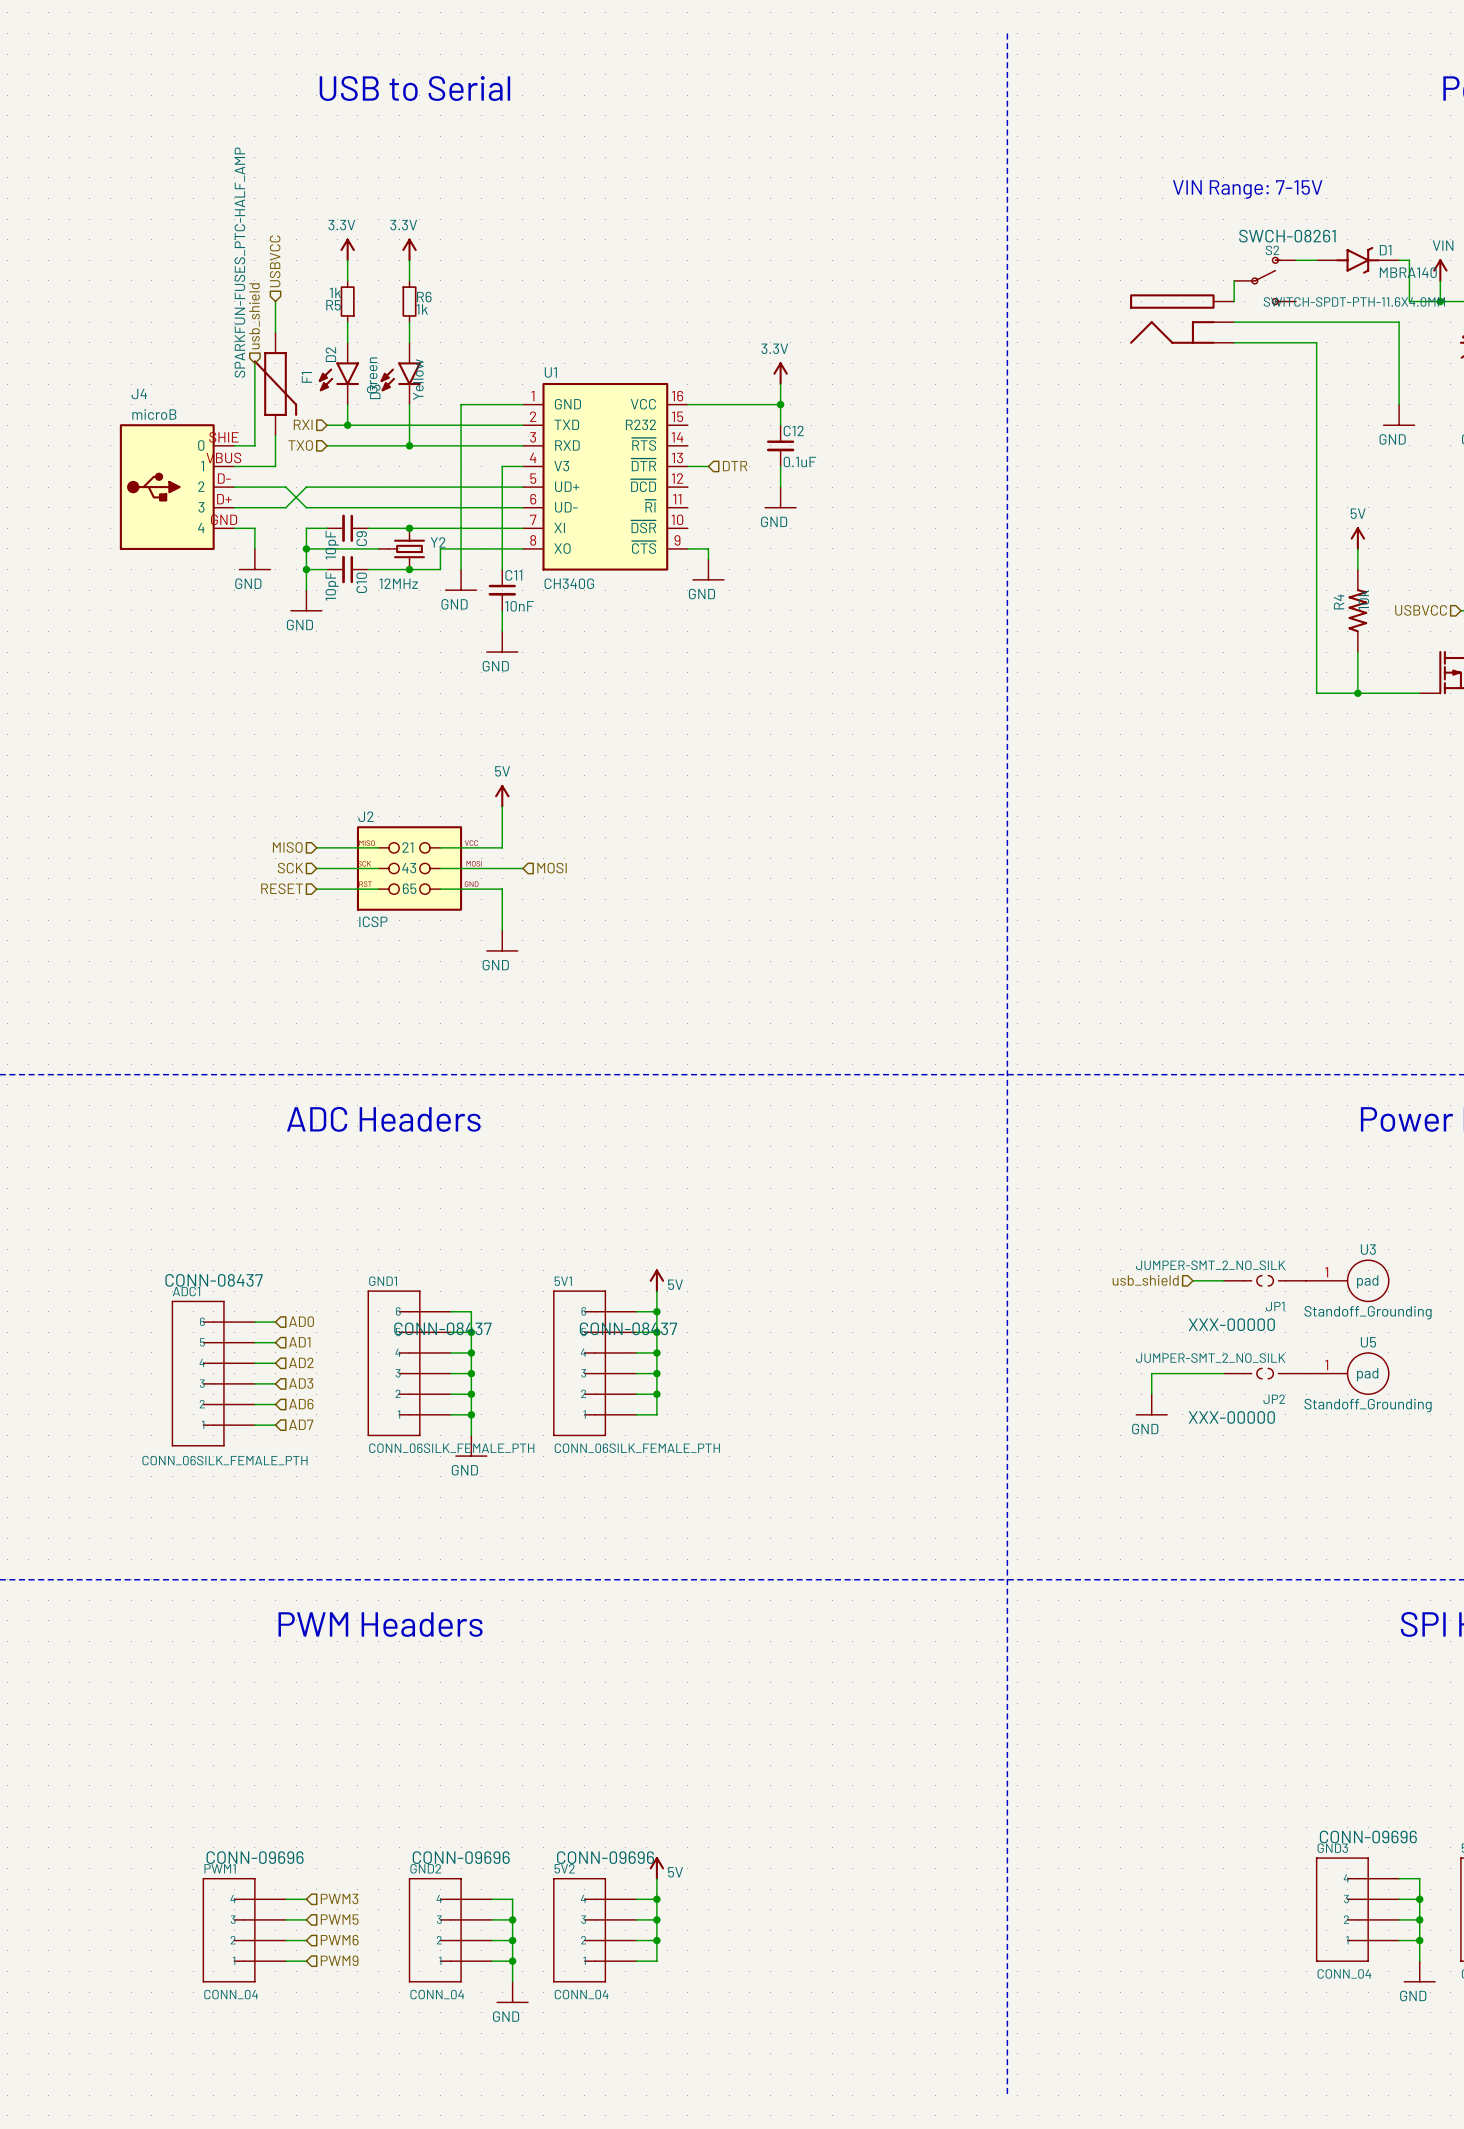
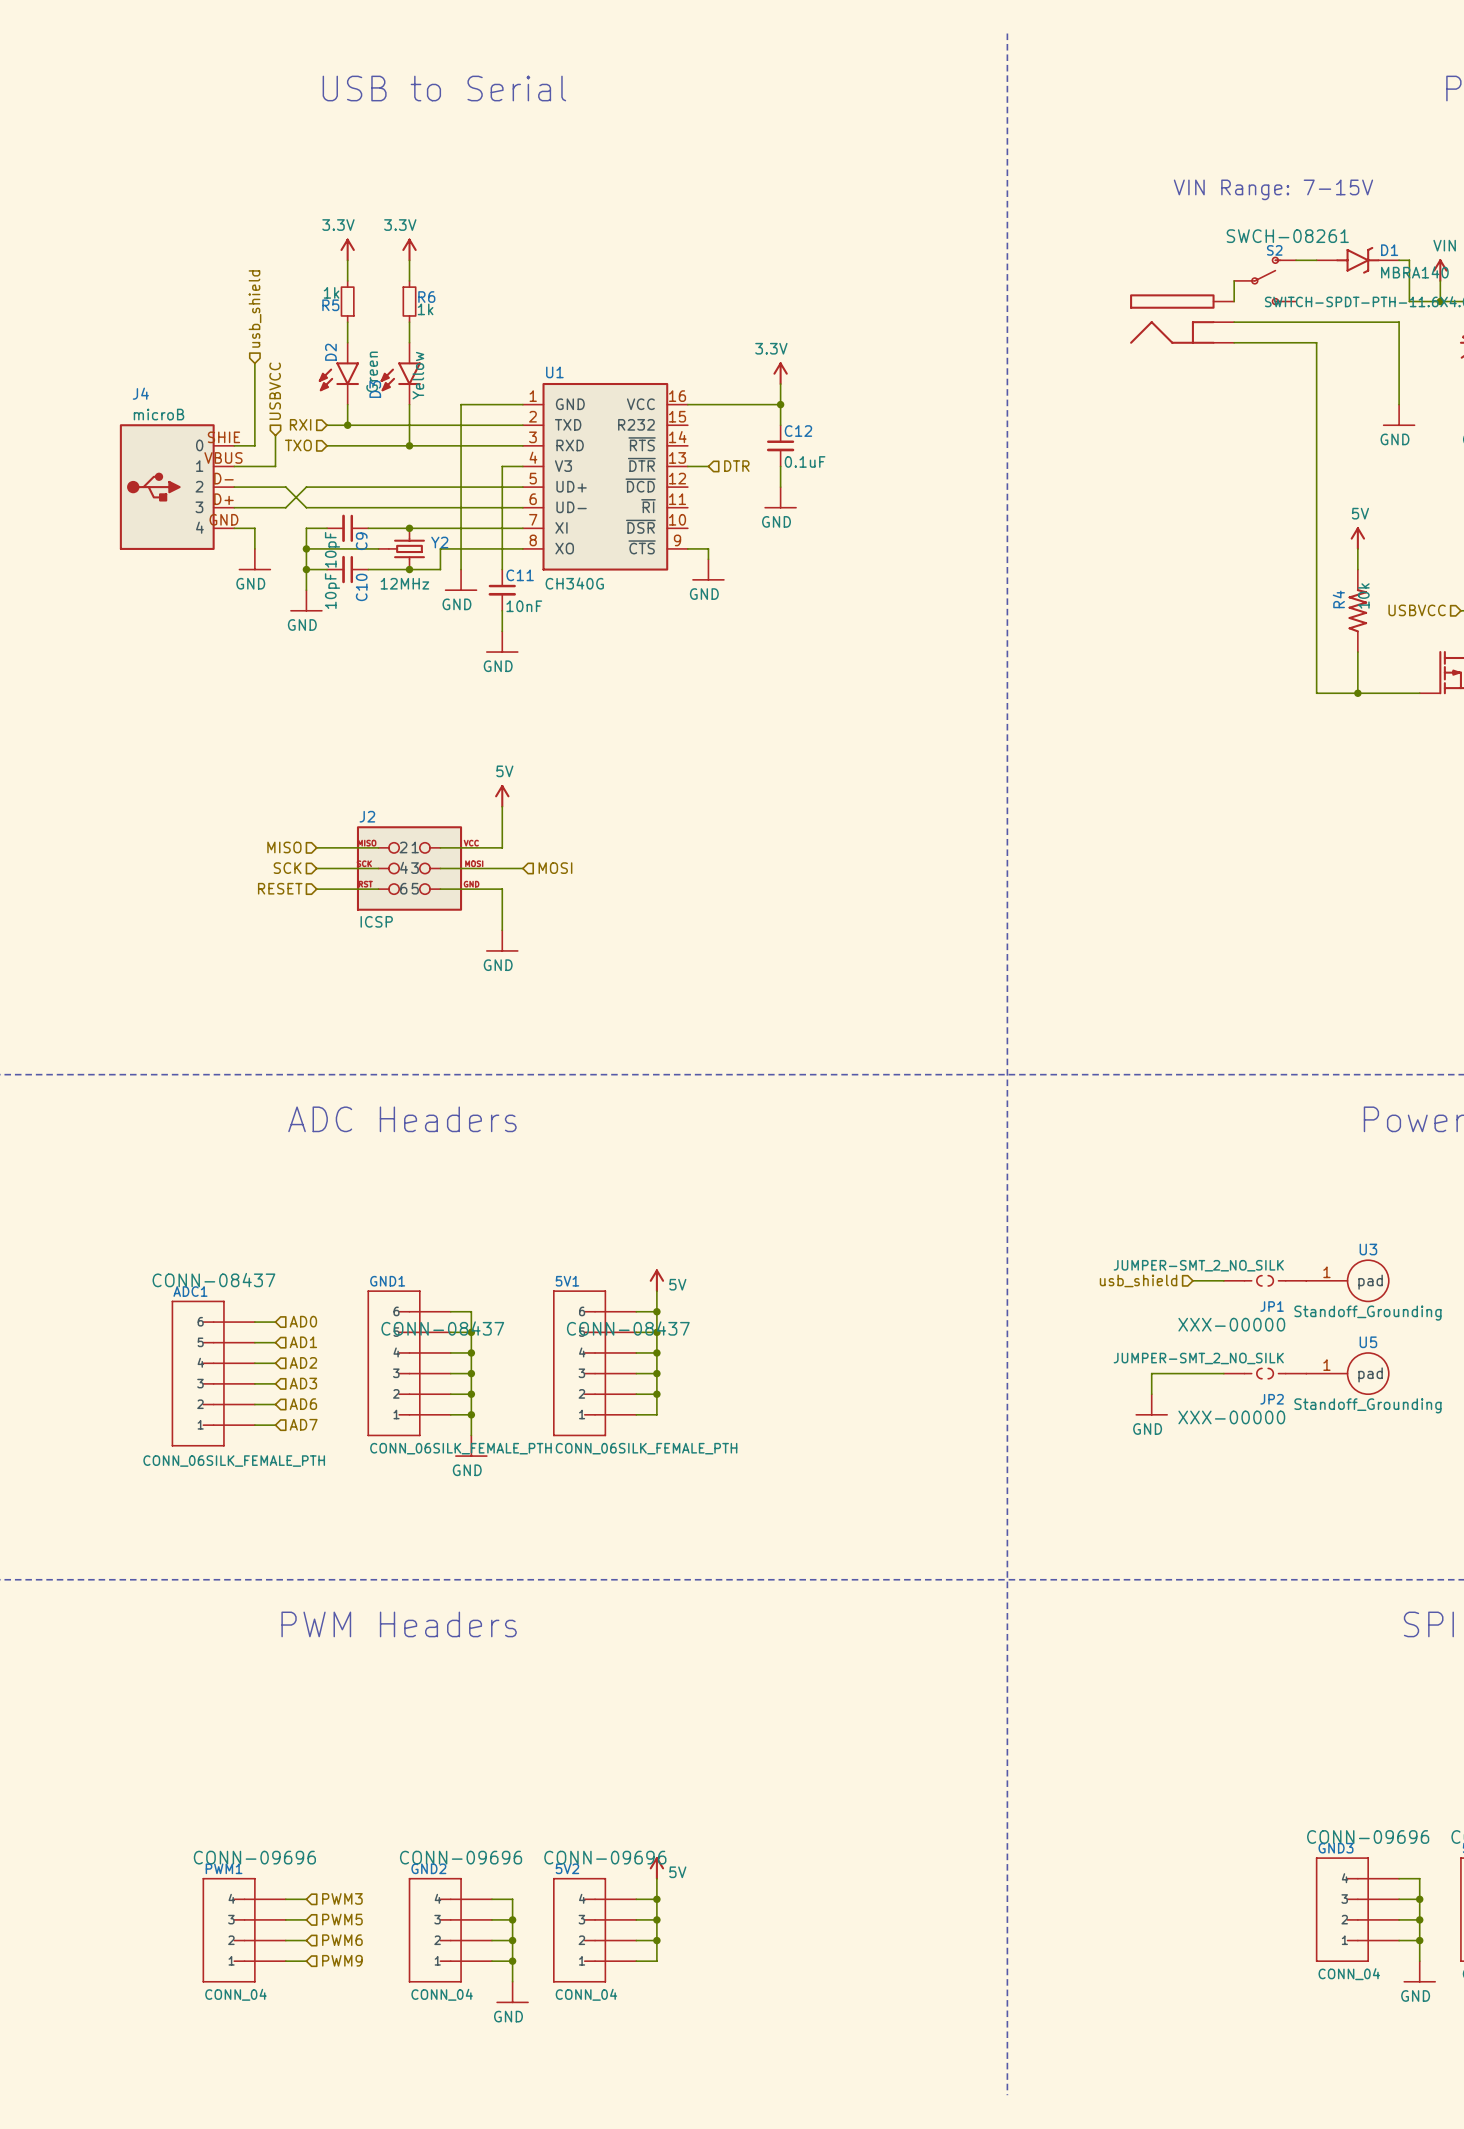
hierarchical label position: USBVCC (275, 261) -> USBVCC (275, 391)
wire: (275, 301) (275, 332) -> none
F1: SPARKFUN-FUSES_PTC-HALF_AMP (275, 384) -> none

